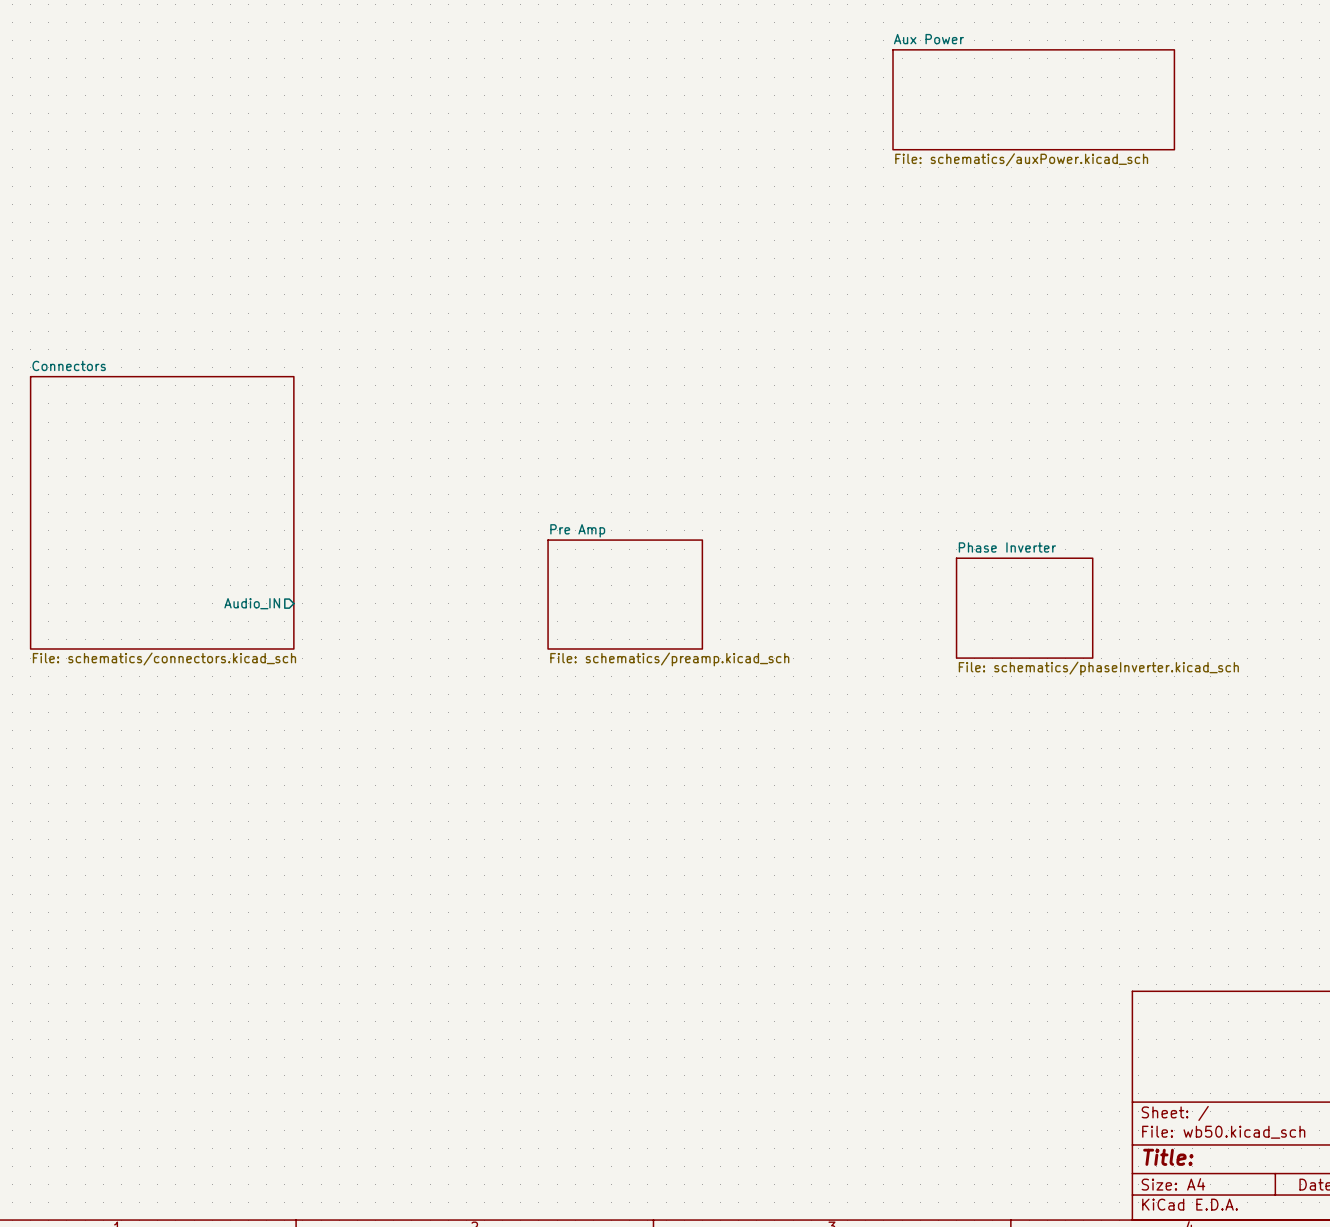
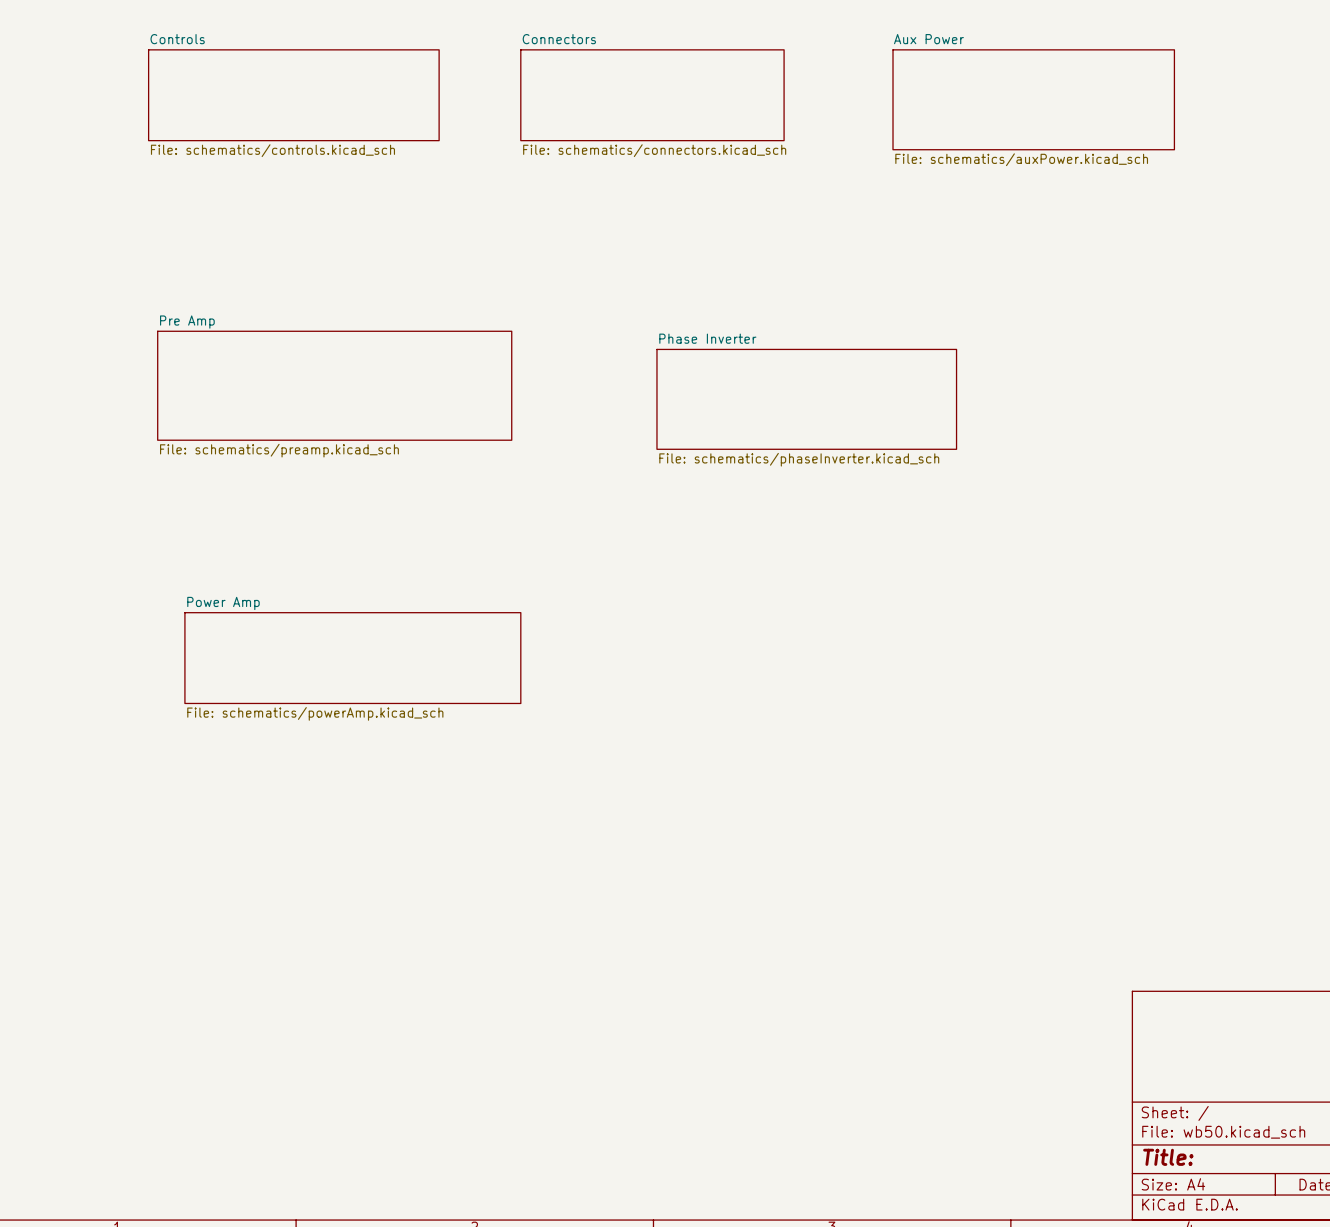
sheet Controls: none -> File: schematics/controls.kicad_sch (293, 95)
sheet Connectors: none -> File: schematics/connectors.kicad_sch (652, 95)
sheet Pre Amp: none -> File: schematics/preamp.kicad_sch (334, 385)
sheet Phase Inverter: none -> File: schematics/phaseInverter.kicad_sch (806, 399)
sheet Connectors: File: schematics/connectors.kicad_sch (162, 512) -> none
sheet Pre Amp: File: schematics/preamp.kicad_sch (625, 594) -> none
sheet pin: Audio_IN (252, 603) -> none
sheet Phase Inverter: File: schematics/phaseInverter.kicad_sch (1024, 608) -> none
sheet Power Amp: none -> File: schematics/powerAmp.kicad_sch (352, 658)

